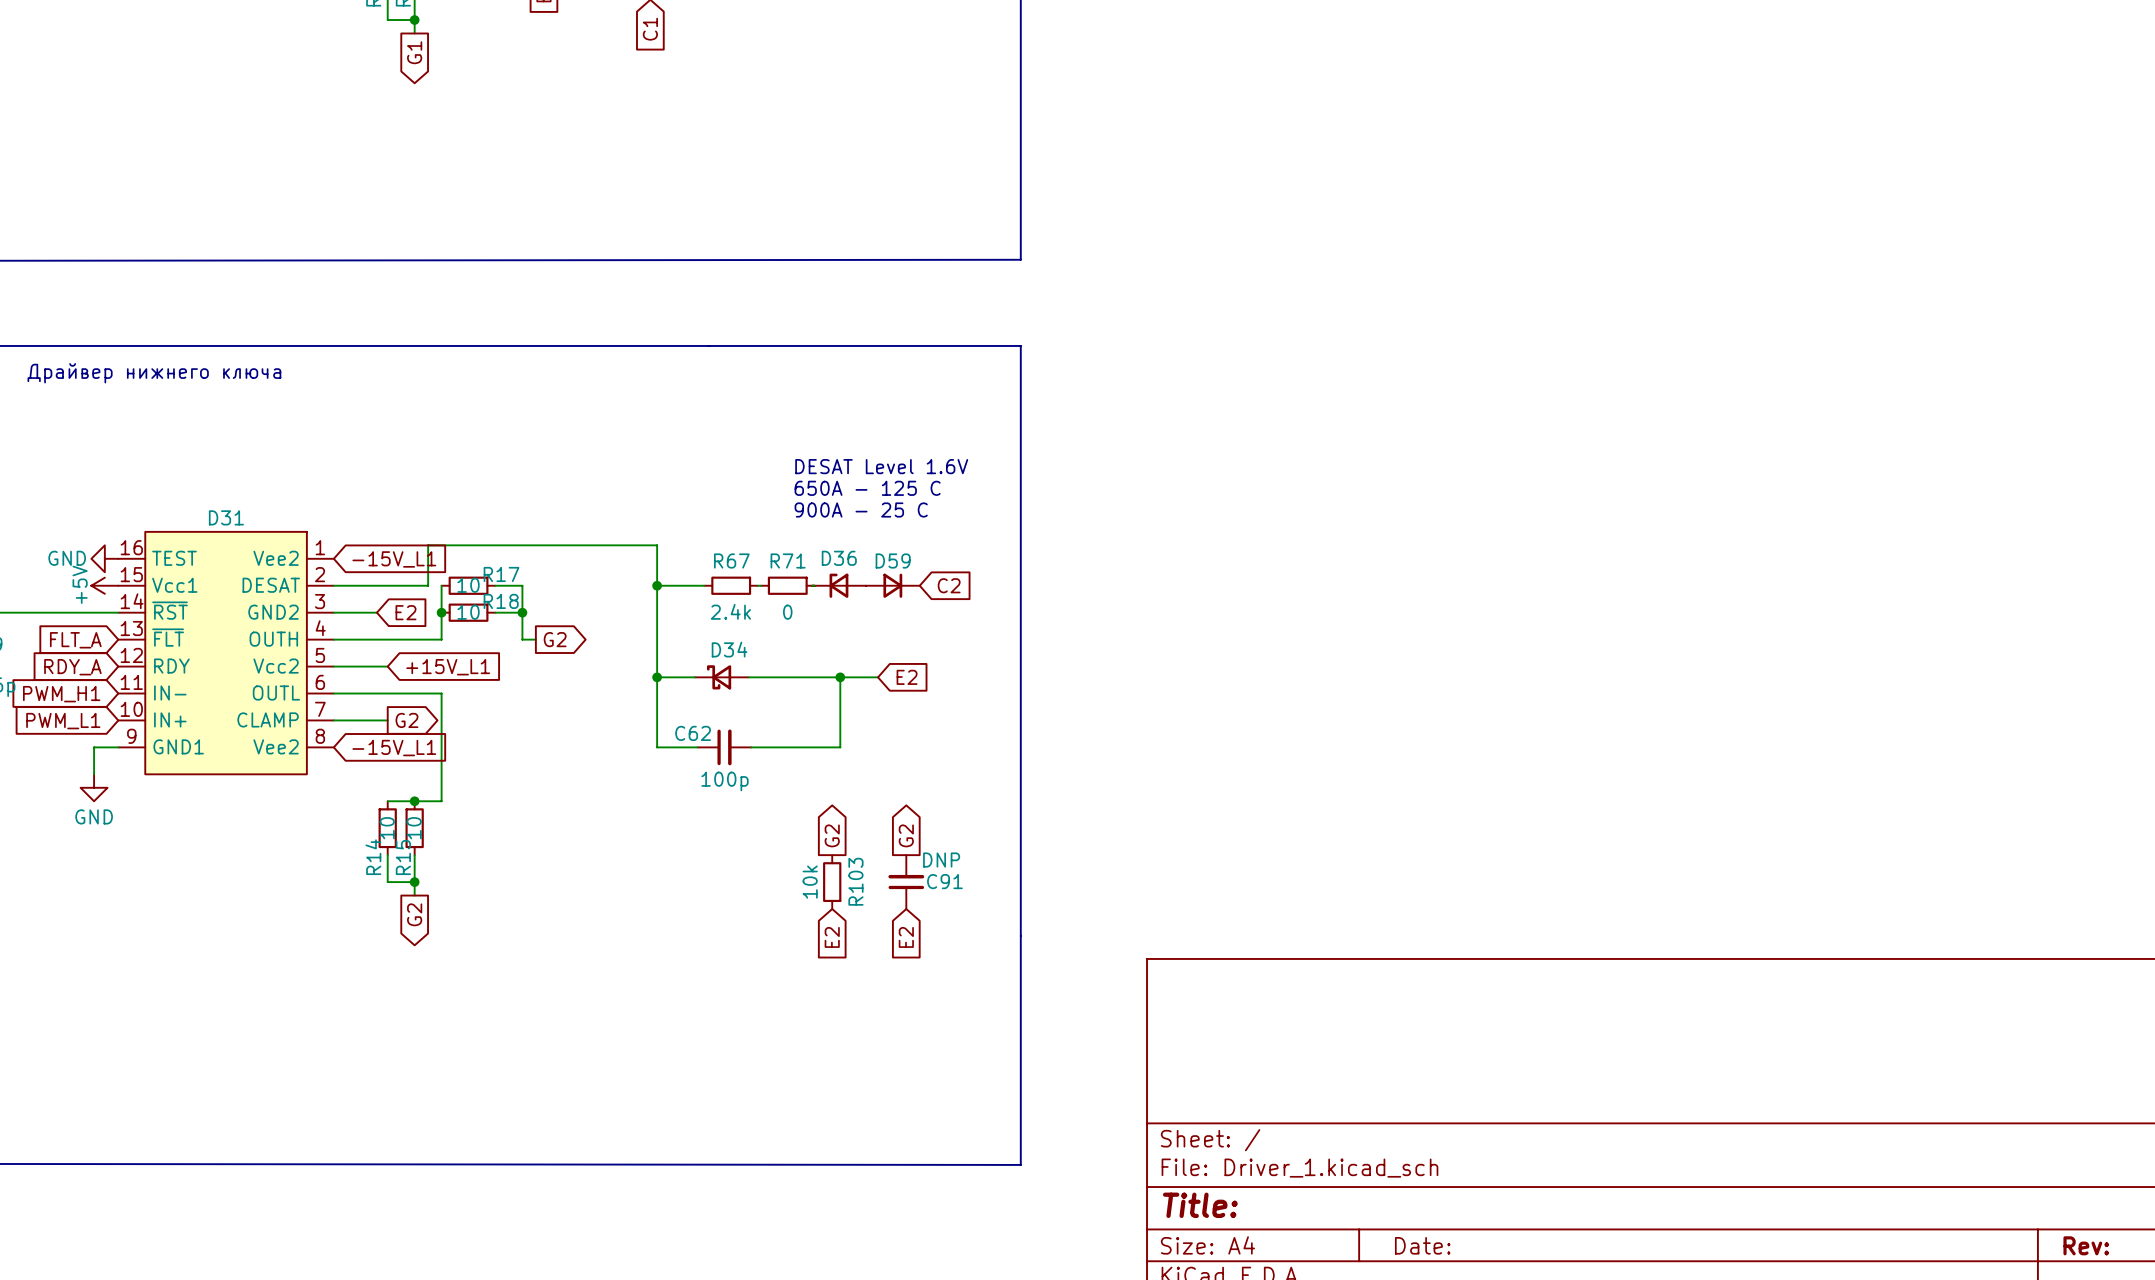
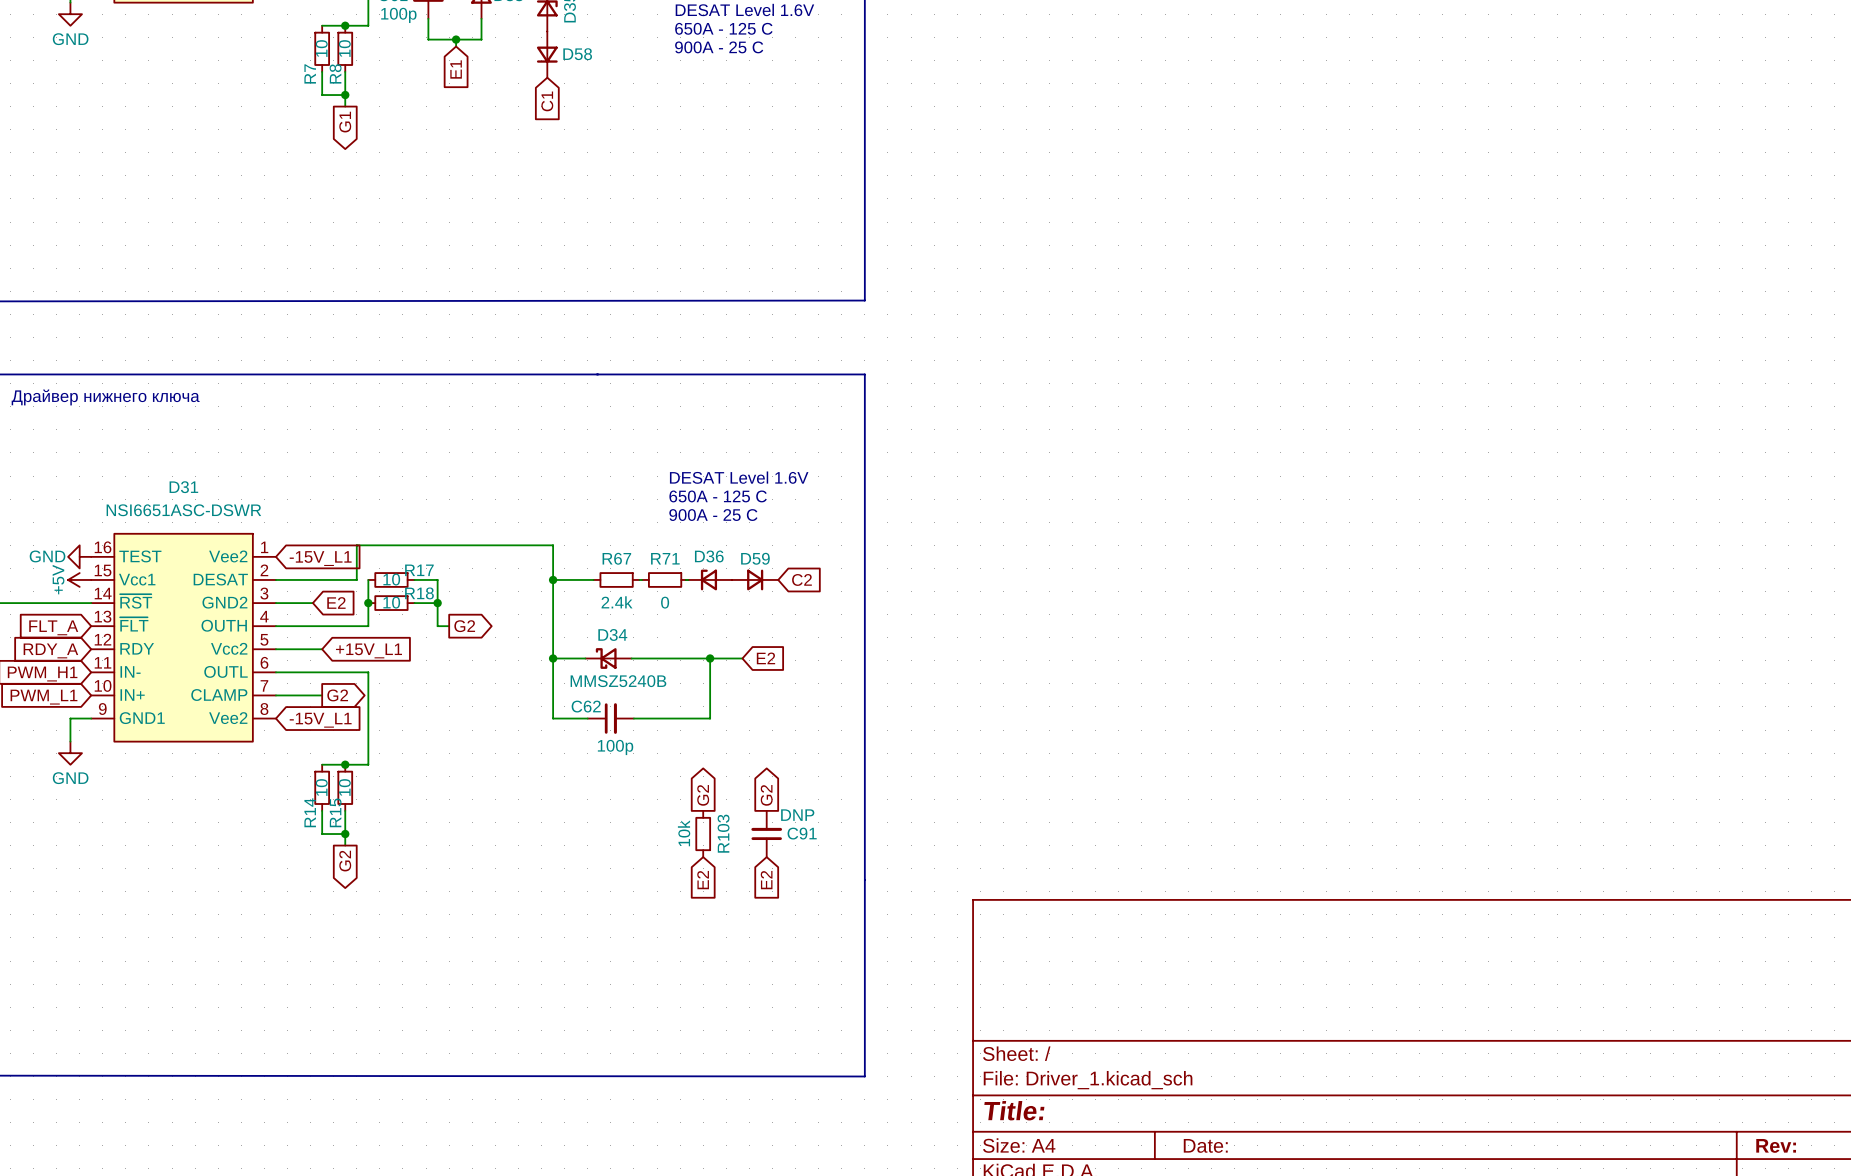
D31 value: none -> NSI6651ASC-DSWR (183, 510)
D31 name position: D31 (226, 517) -> D31 (183, 487)
D34 value: none -> MMSZ5240B (618, 681)

